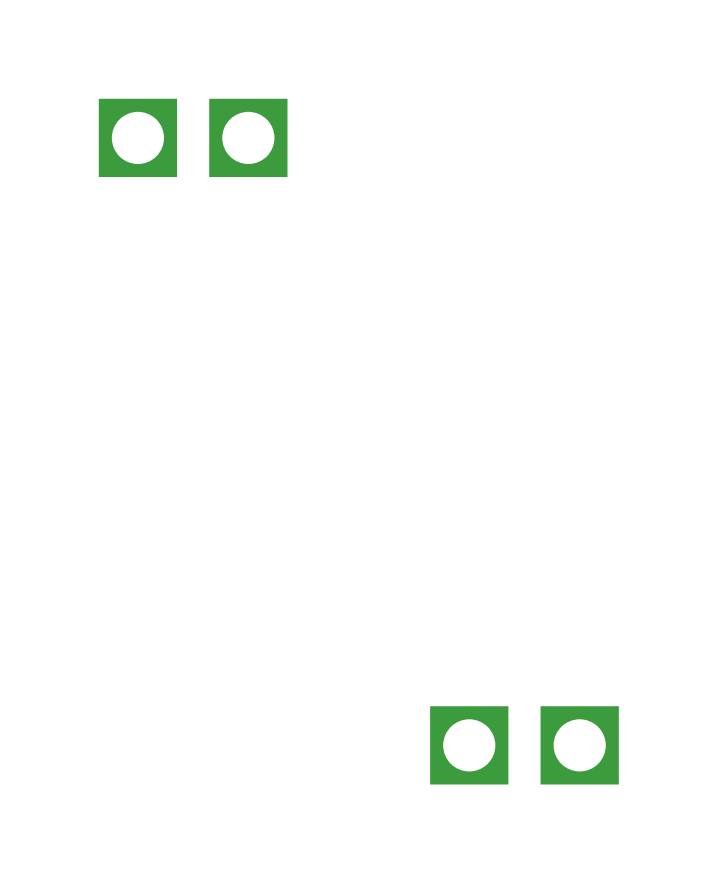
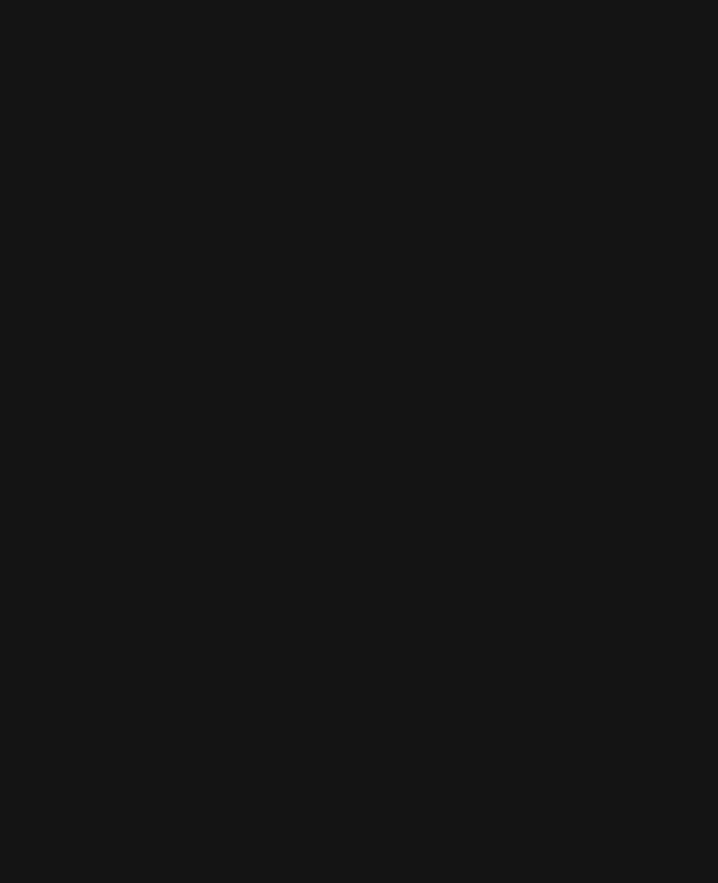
part: (193, 137) -> none
part: (524, 745) -> none

